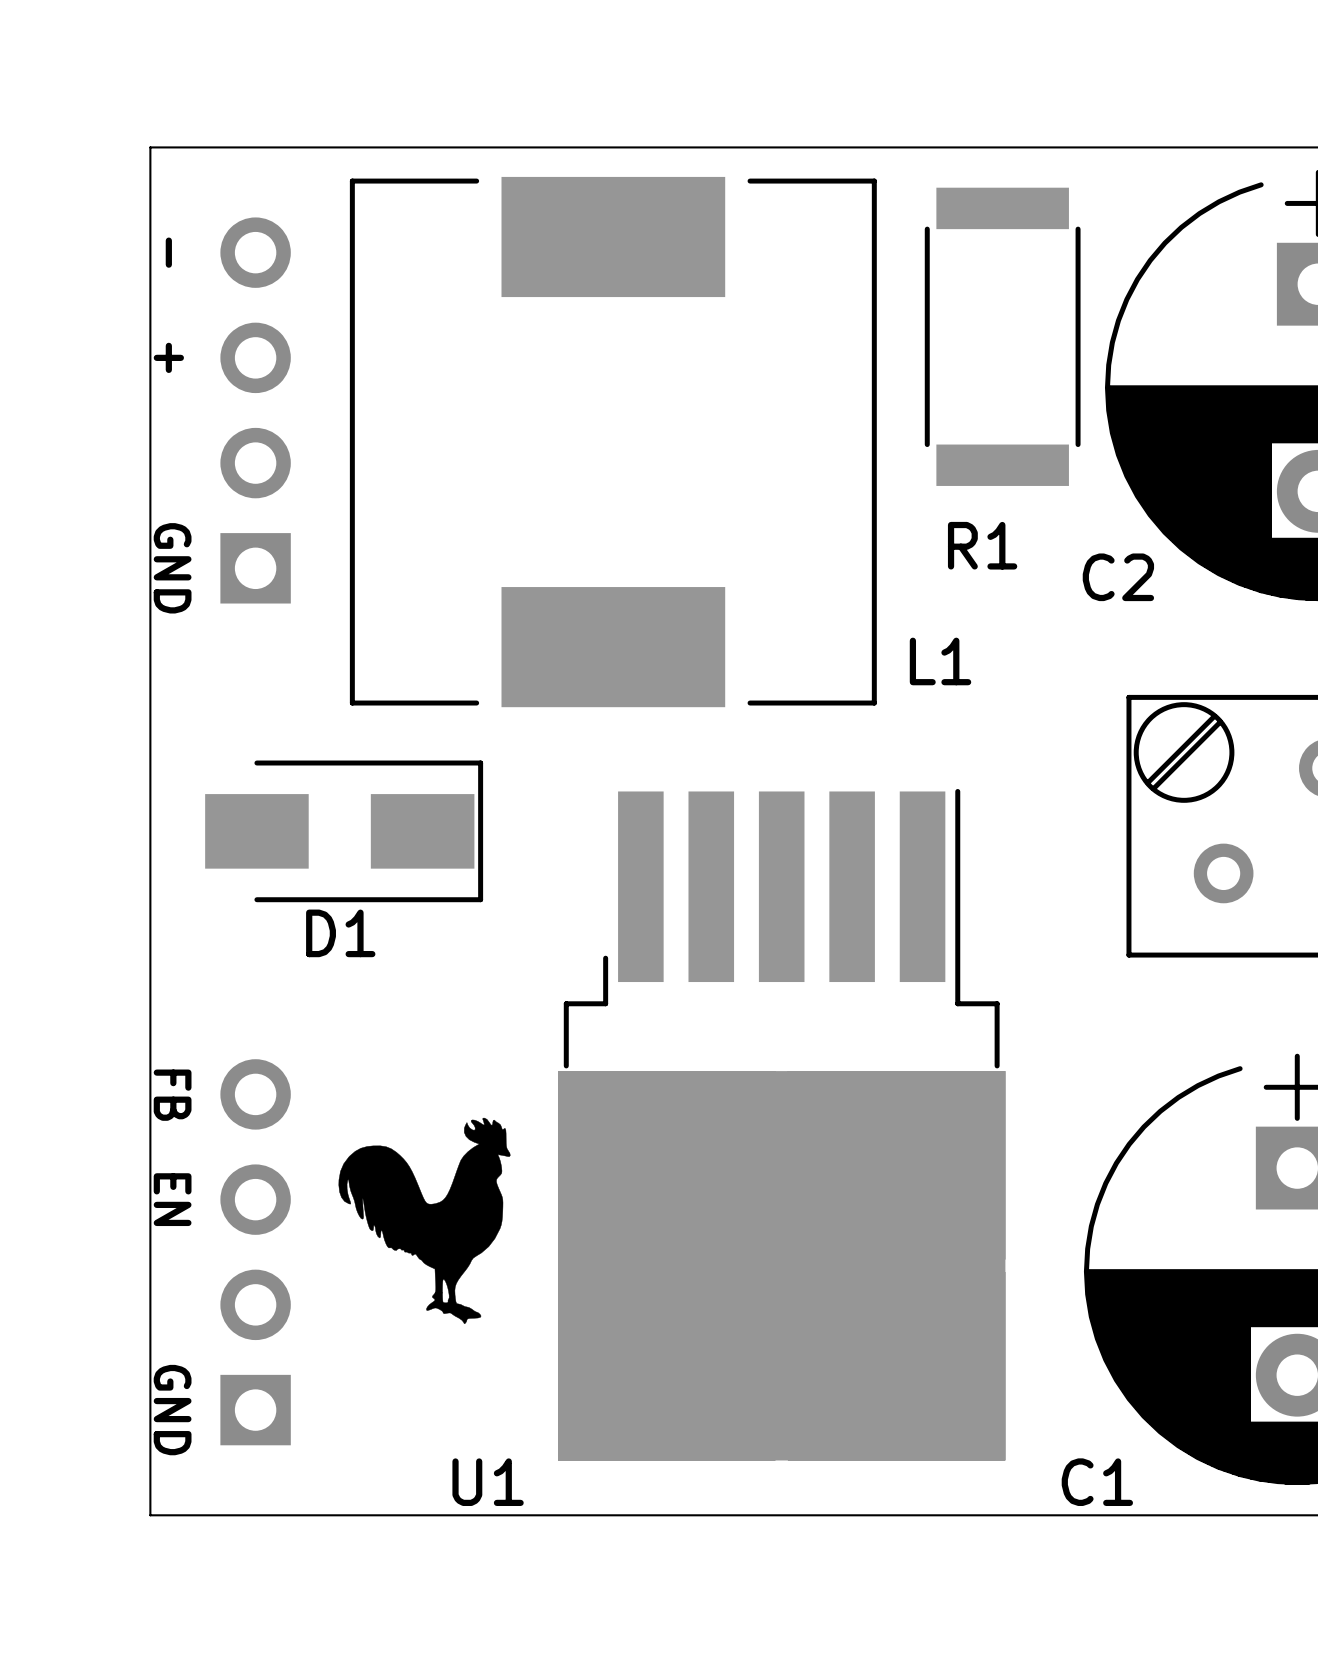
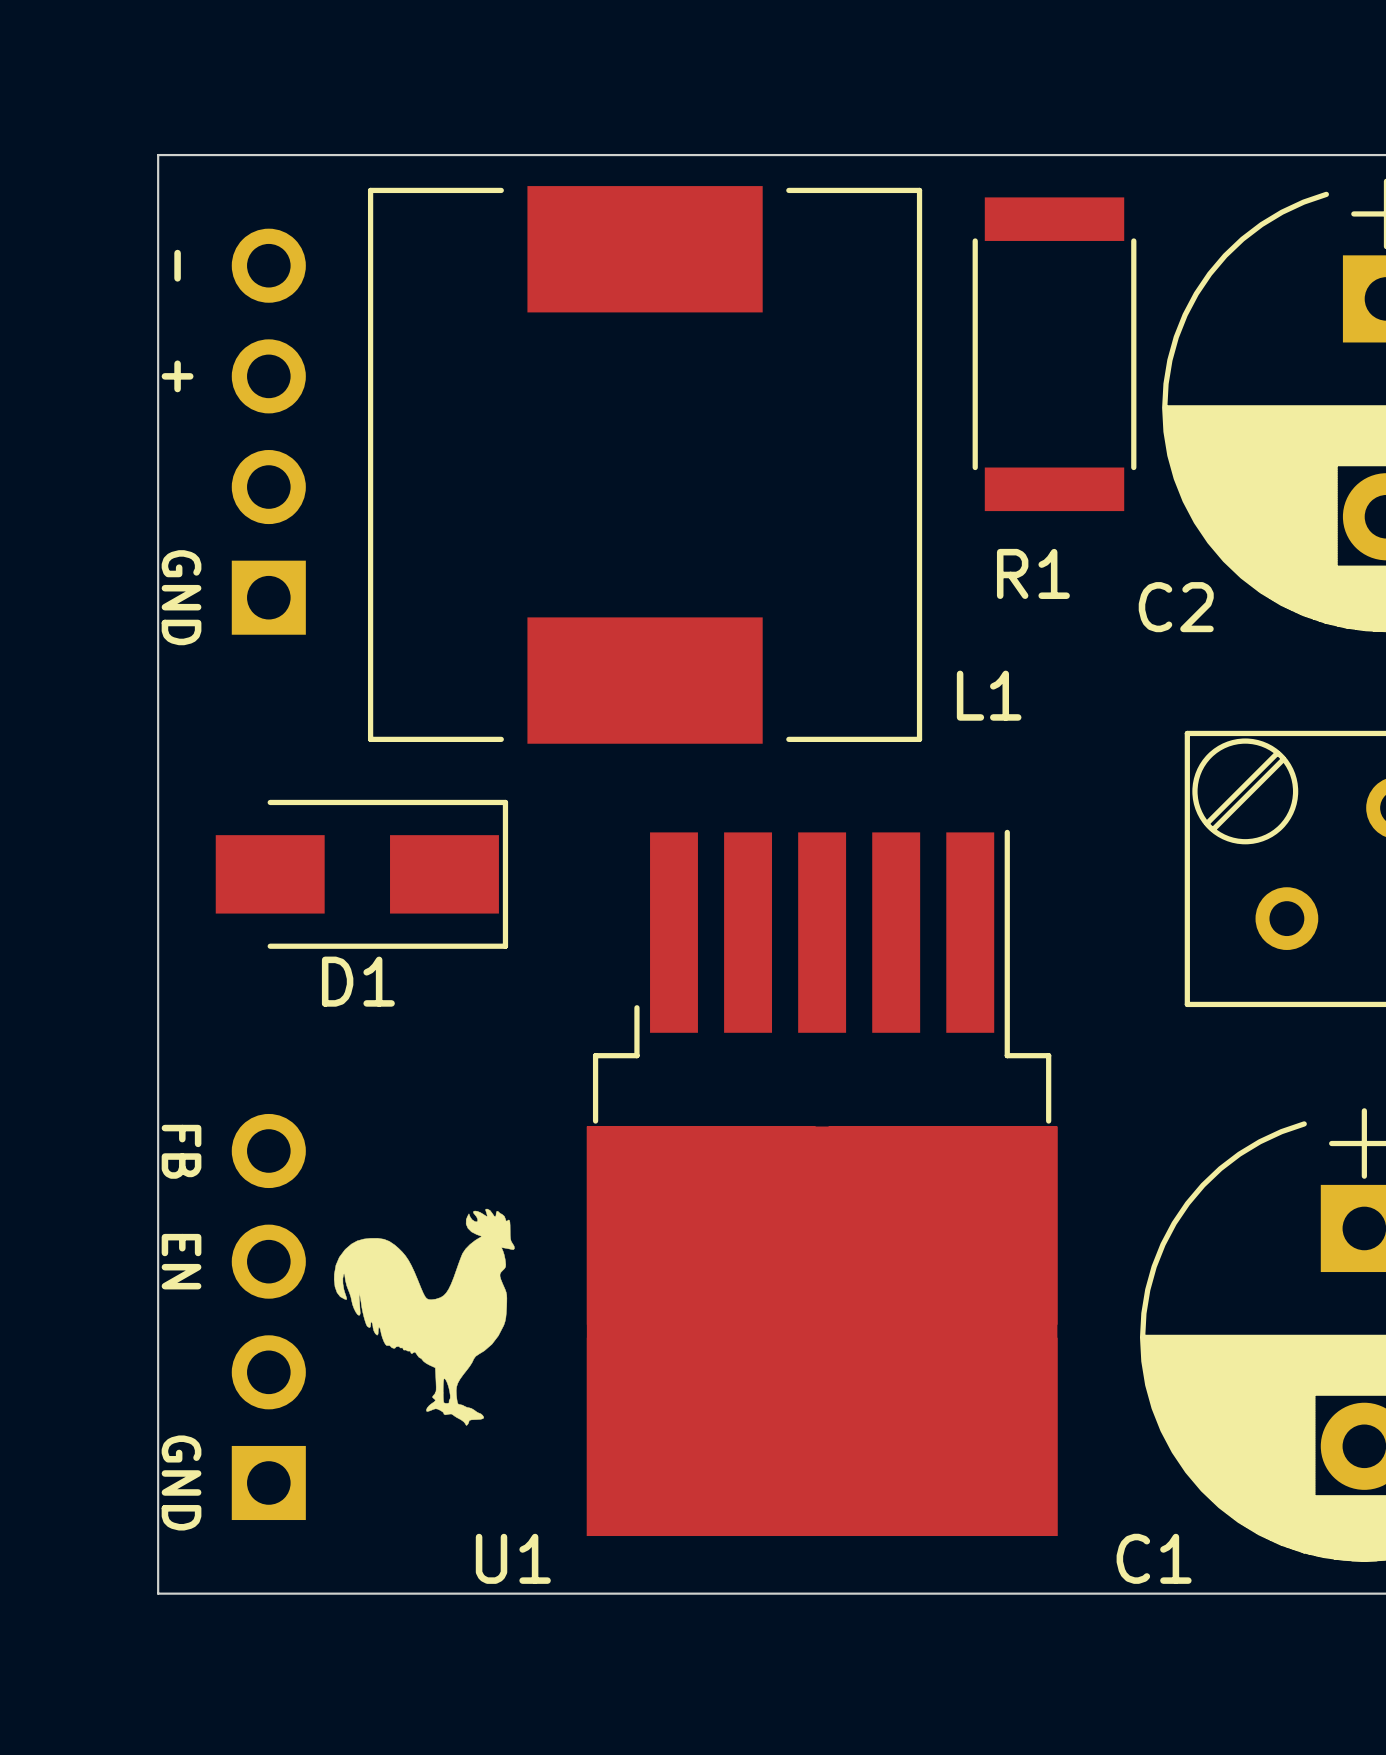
drawing position: (424, 1220) -> (424, 1317)

